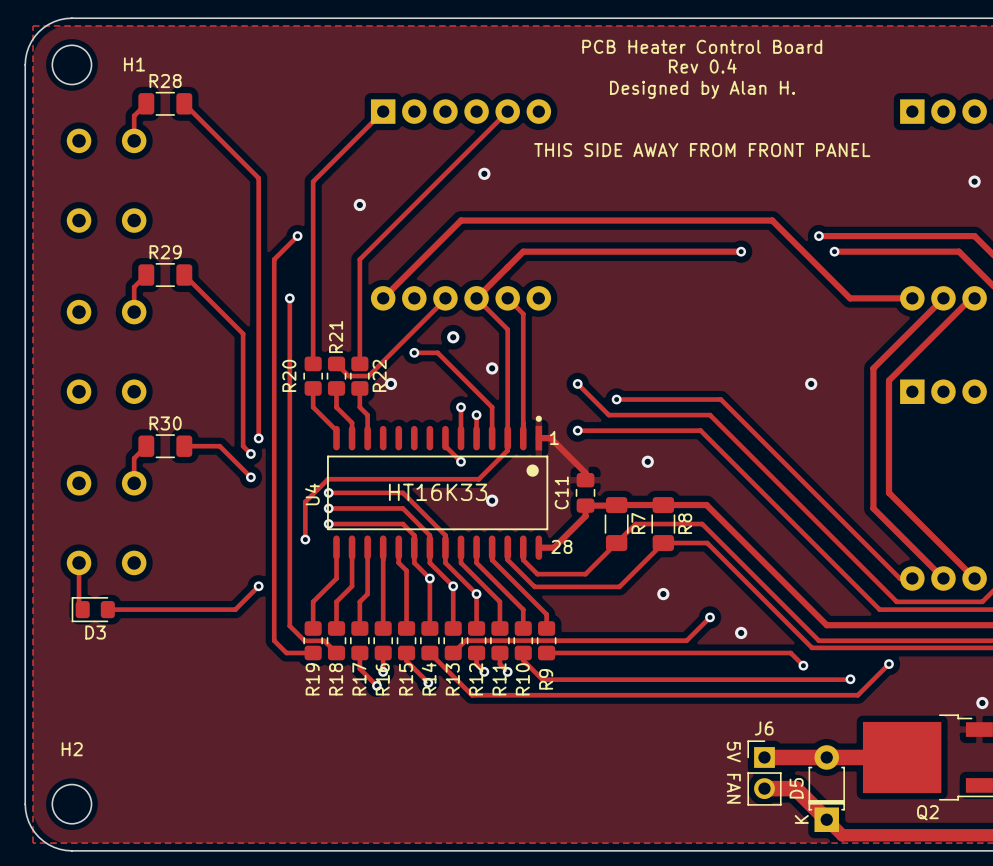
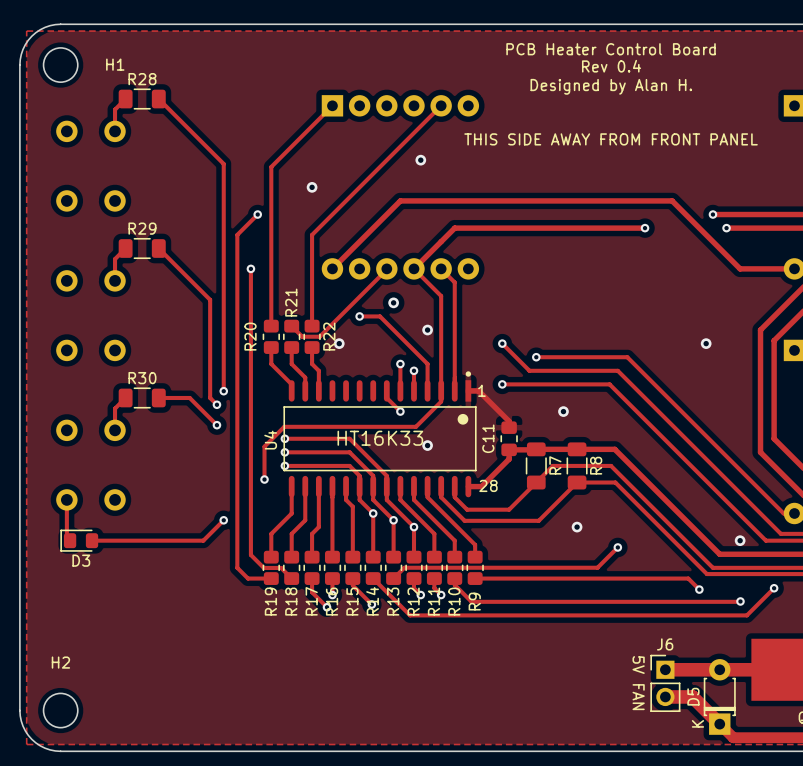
via: none -> (740, 540)
via: (741, 632) -> none

